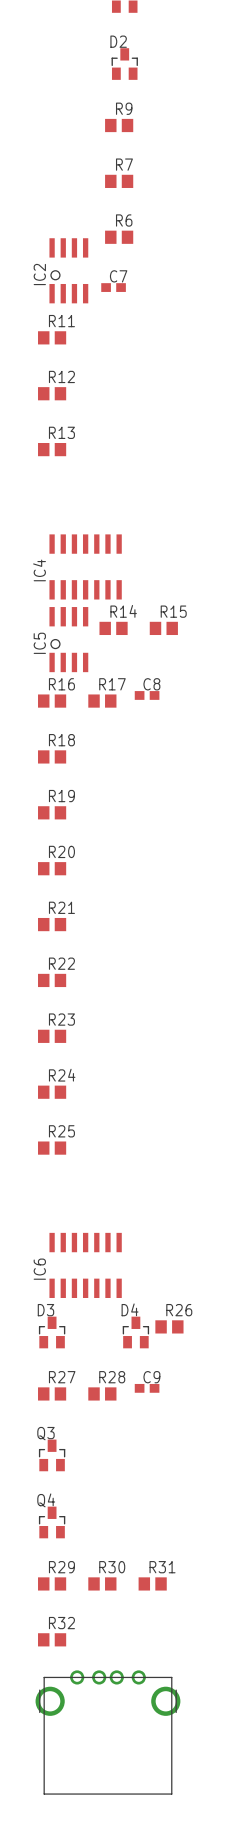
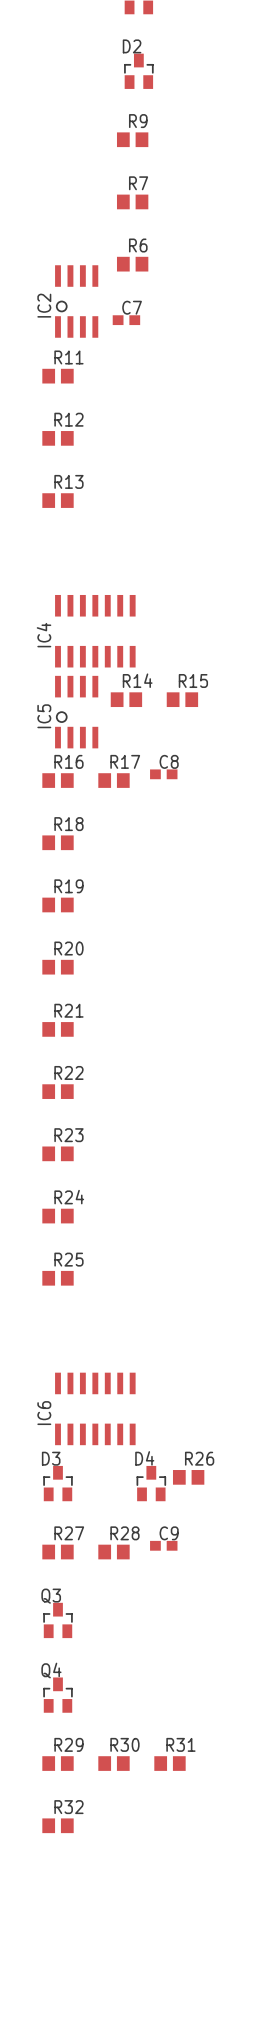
part: (107, 1732) -> none

